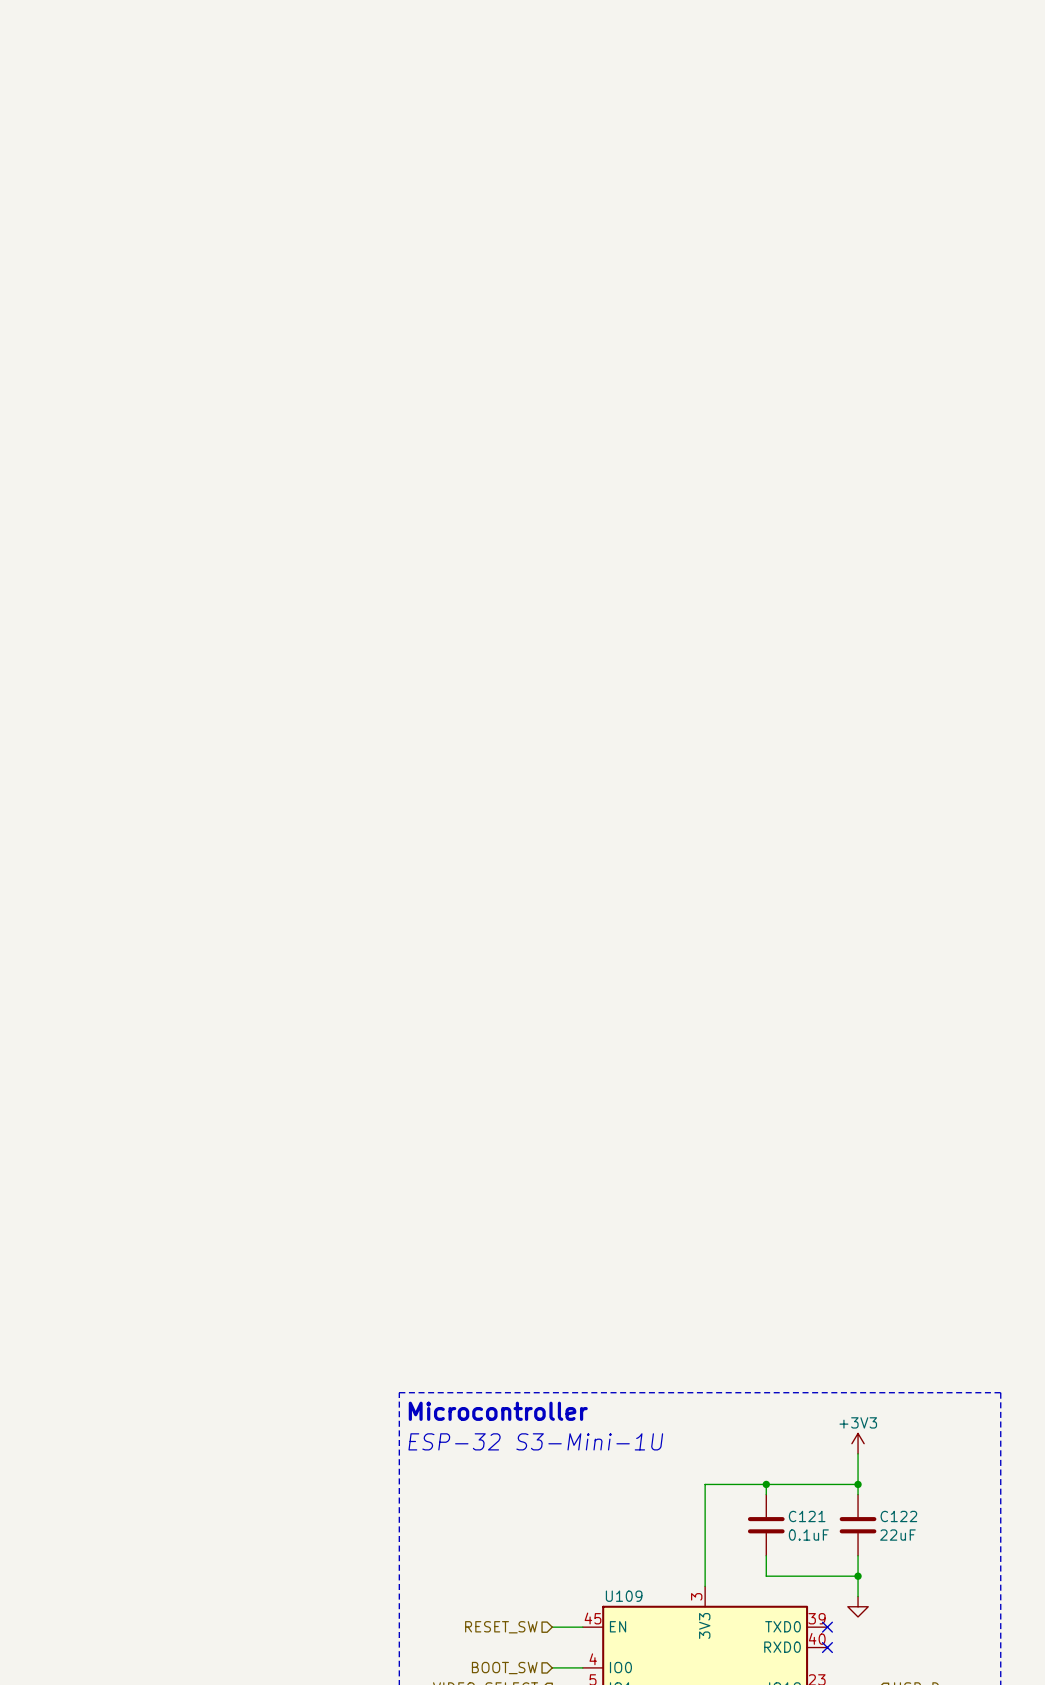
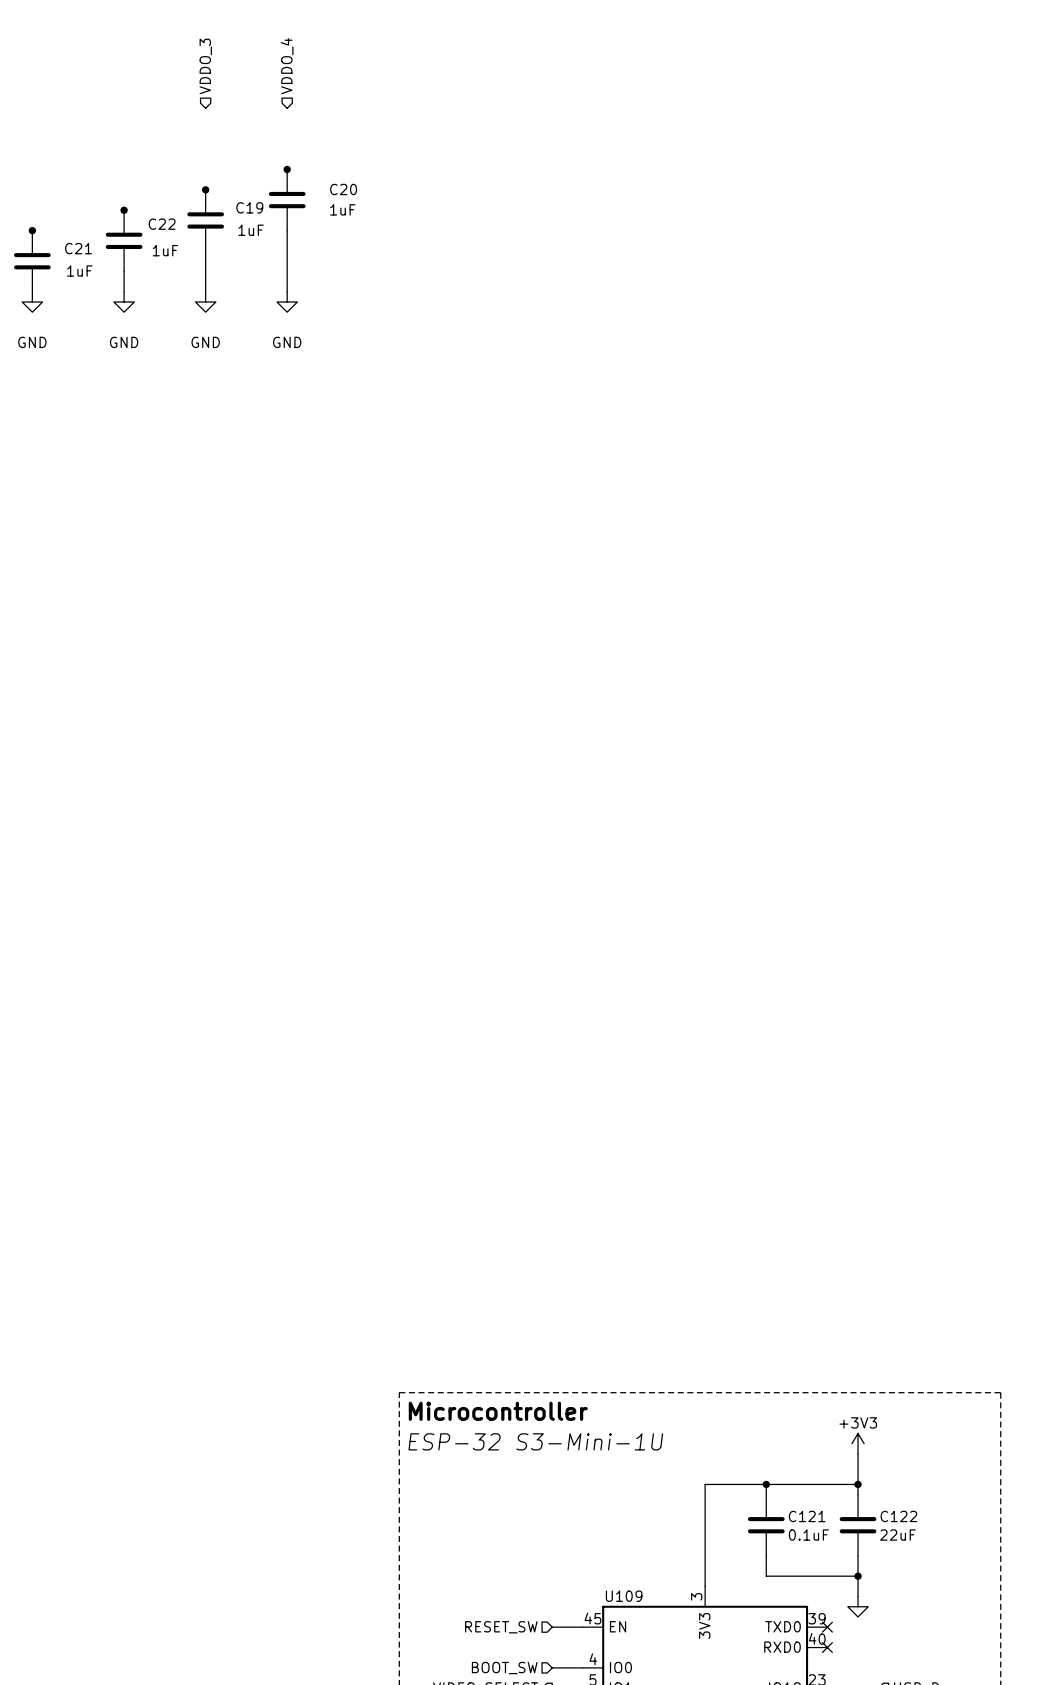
hierarchical label: none -> VDDO_3 (205, 66)
hierarchical label: none -> VDDO_4 (287, 66)
junction: none -> (287, 169)
junction: none -> (205, 189)
C20: none -> 1uF (287, 200)
junction: none -> (124, 210)
C19: none -> 1uF (205, 220)
junction: none -> (32, 230)
wire: none -> (287, 230) (287, 291)
C22: none -> 1uF (124, 240)
wire: none -> (205, 251) (205, 291)
C21: none -> 1uF (32, 261)
wire: none -> (124, 271) (124, 291)
power symbol: none -> GND (32, 302)
power symbol: none -> GND (124, 302)
power symbol: none -> GND (205, 302)
power symbol: none -> GND (287, 302)

